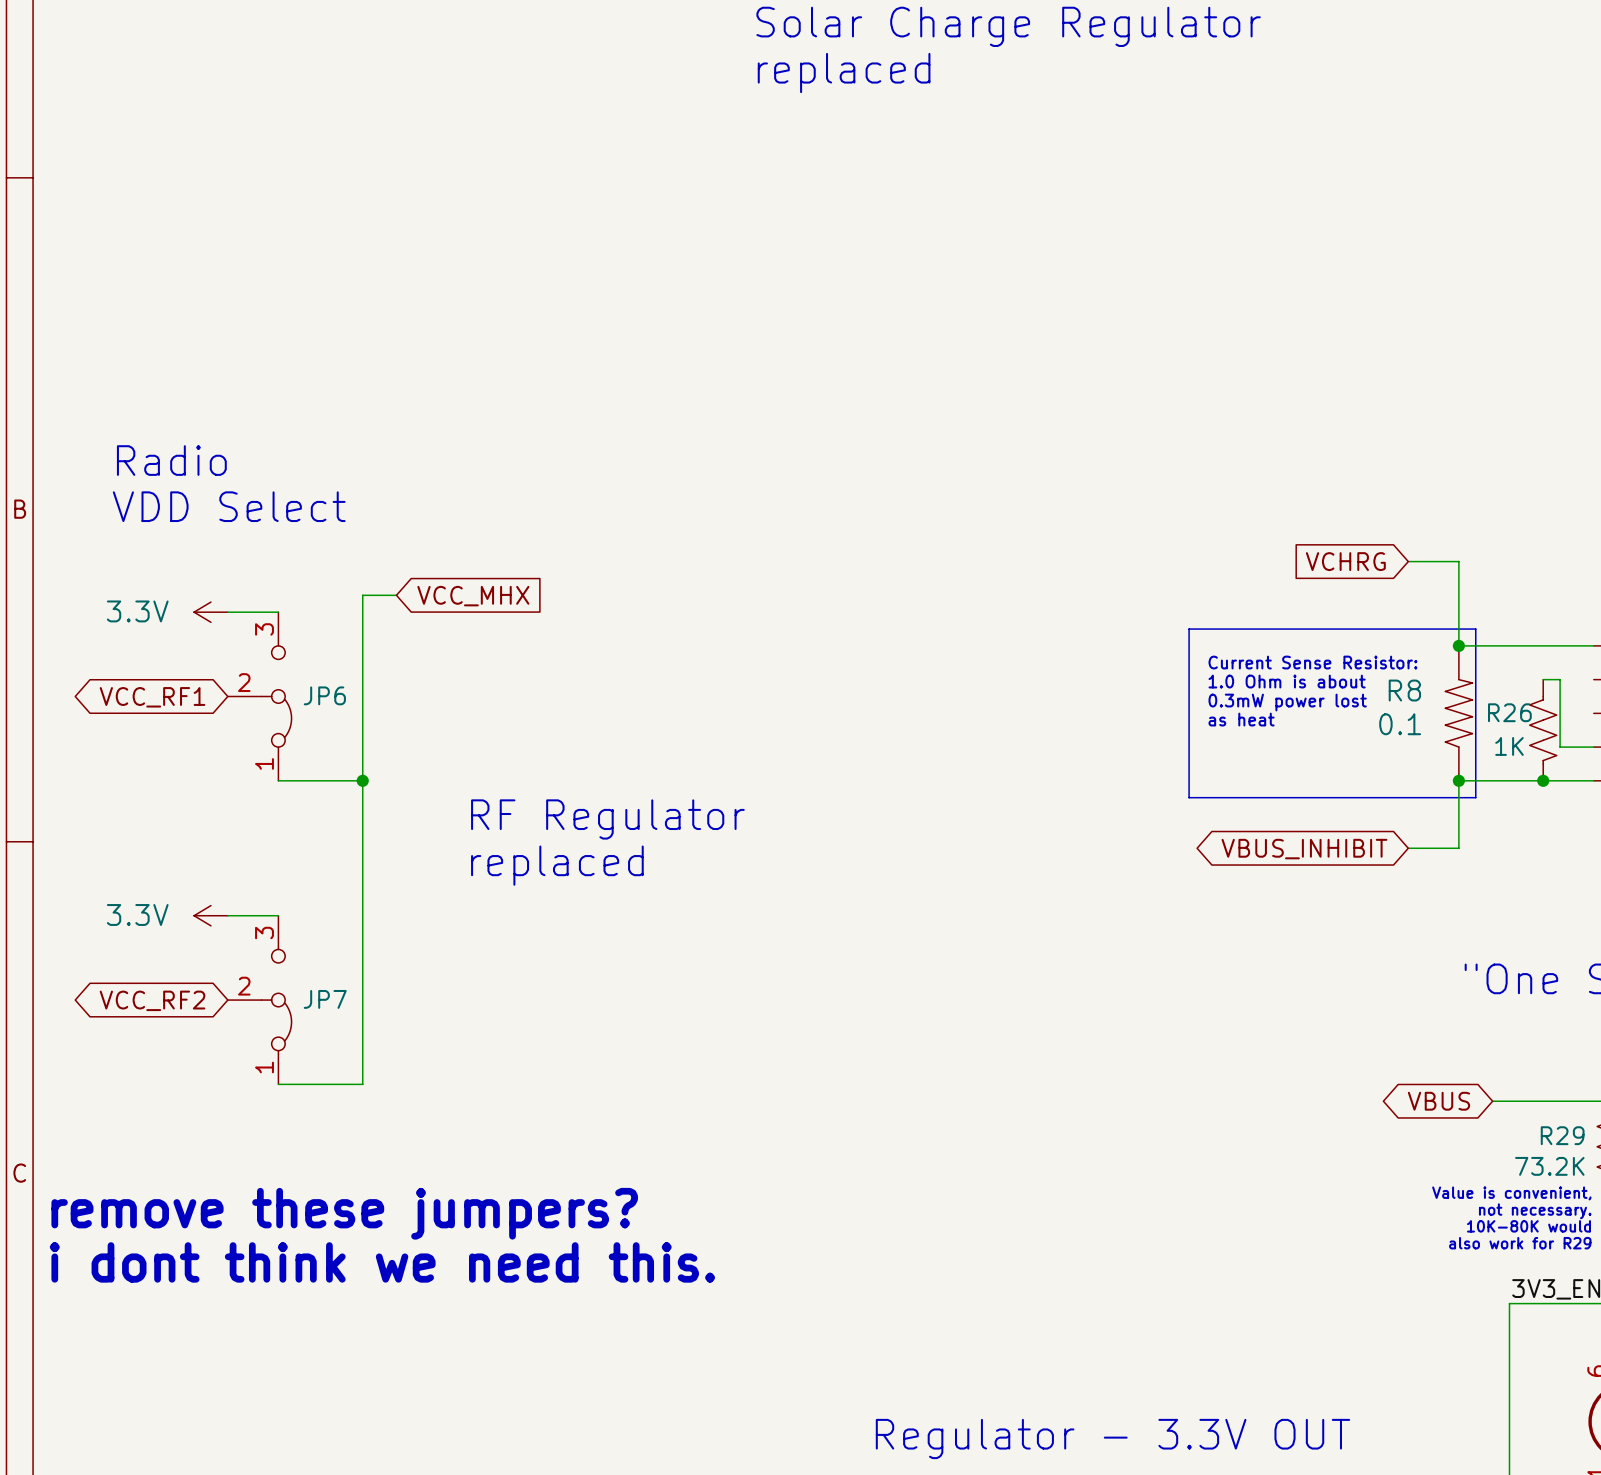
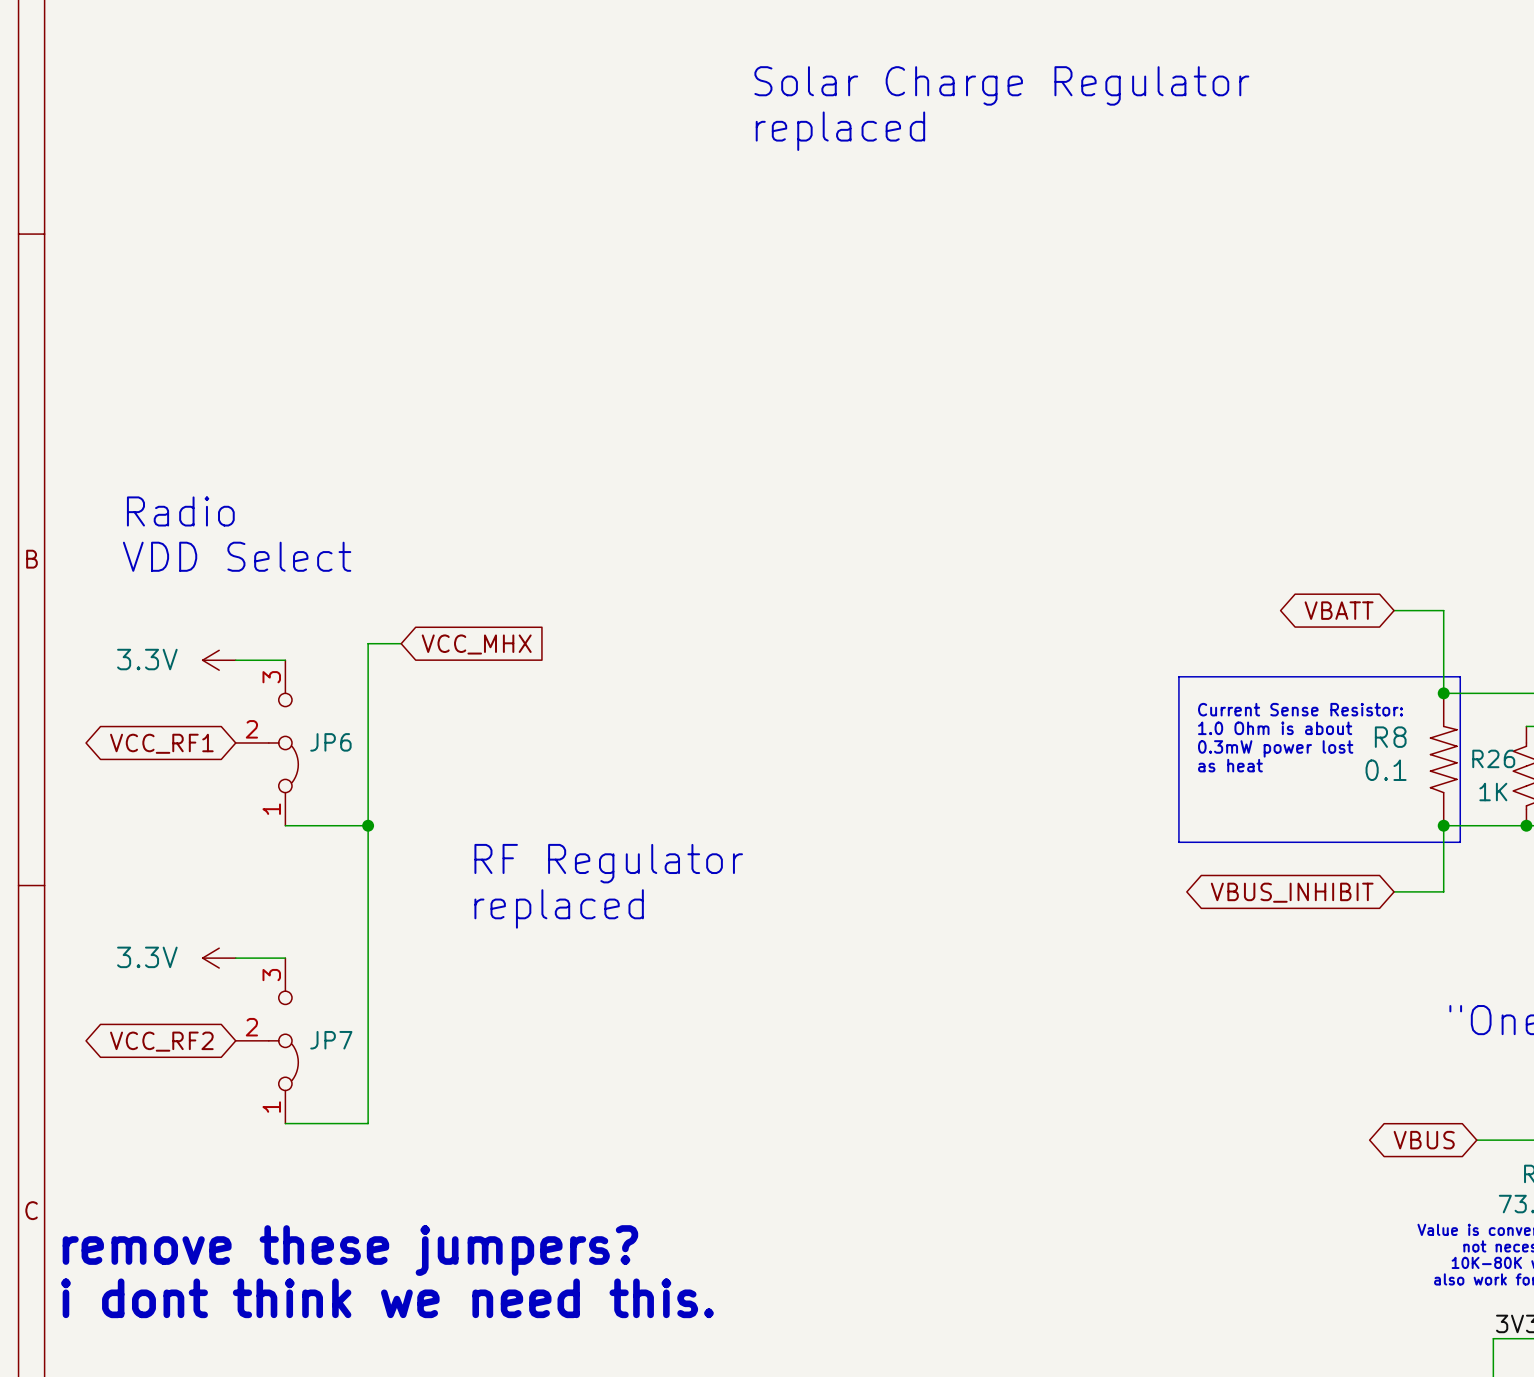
global label shape: input (1345, 561) -> bidirectional (1339, 610)
global label: VCHRG (1345, 561) -> VBATT (1339, 610)

